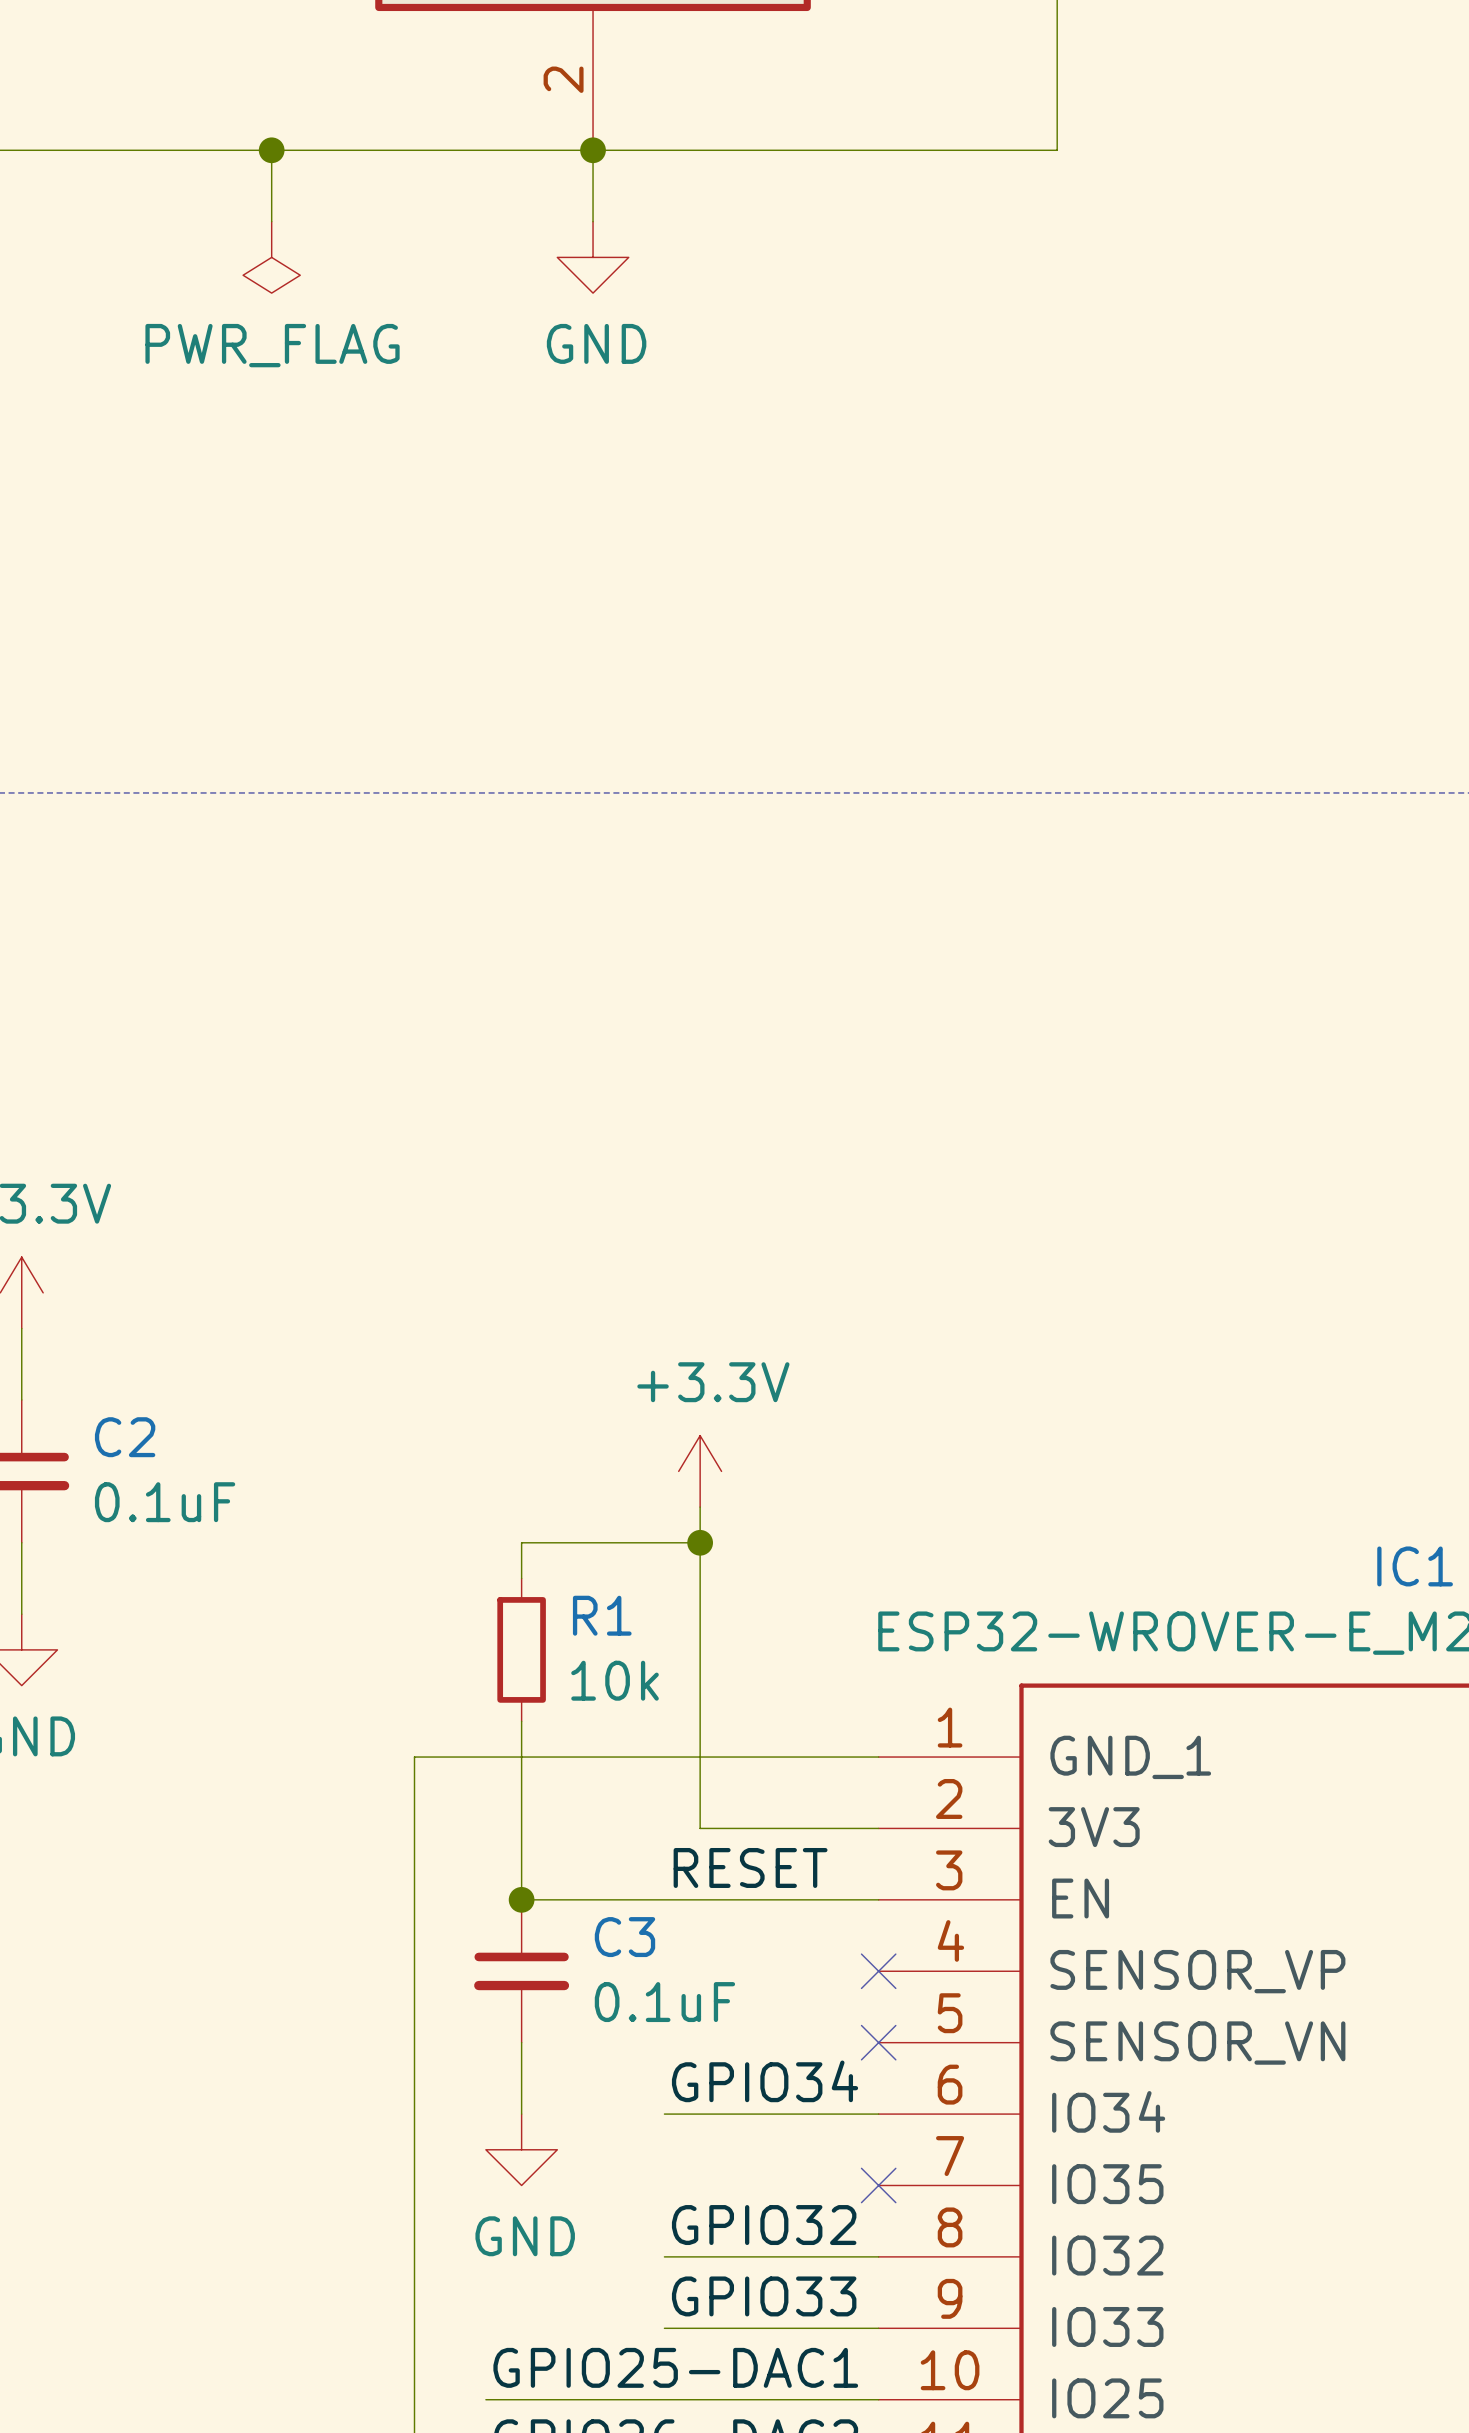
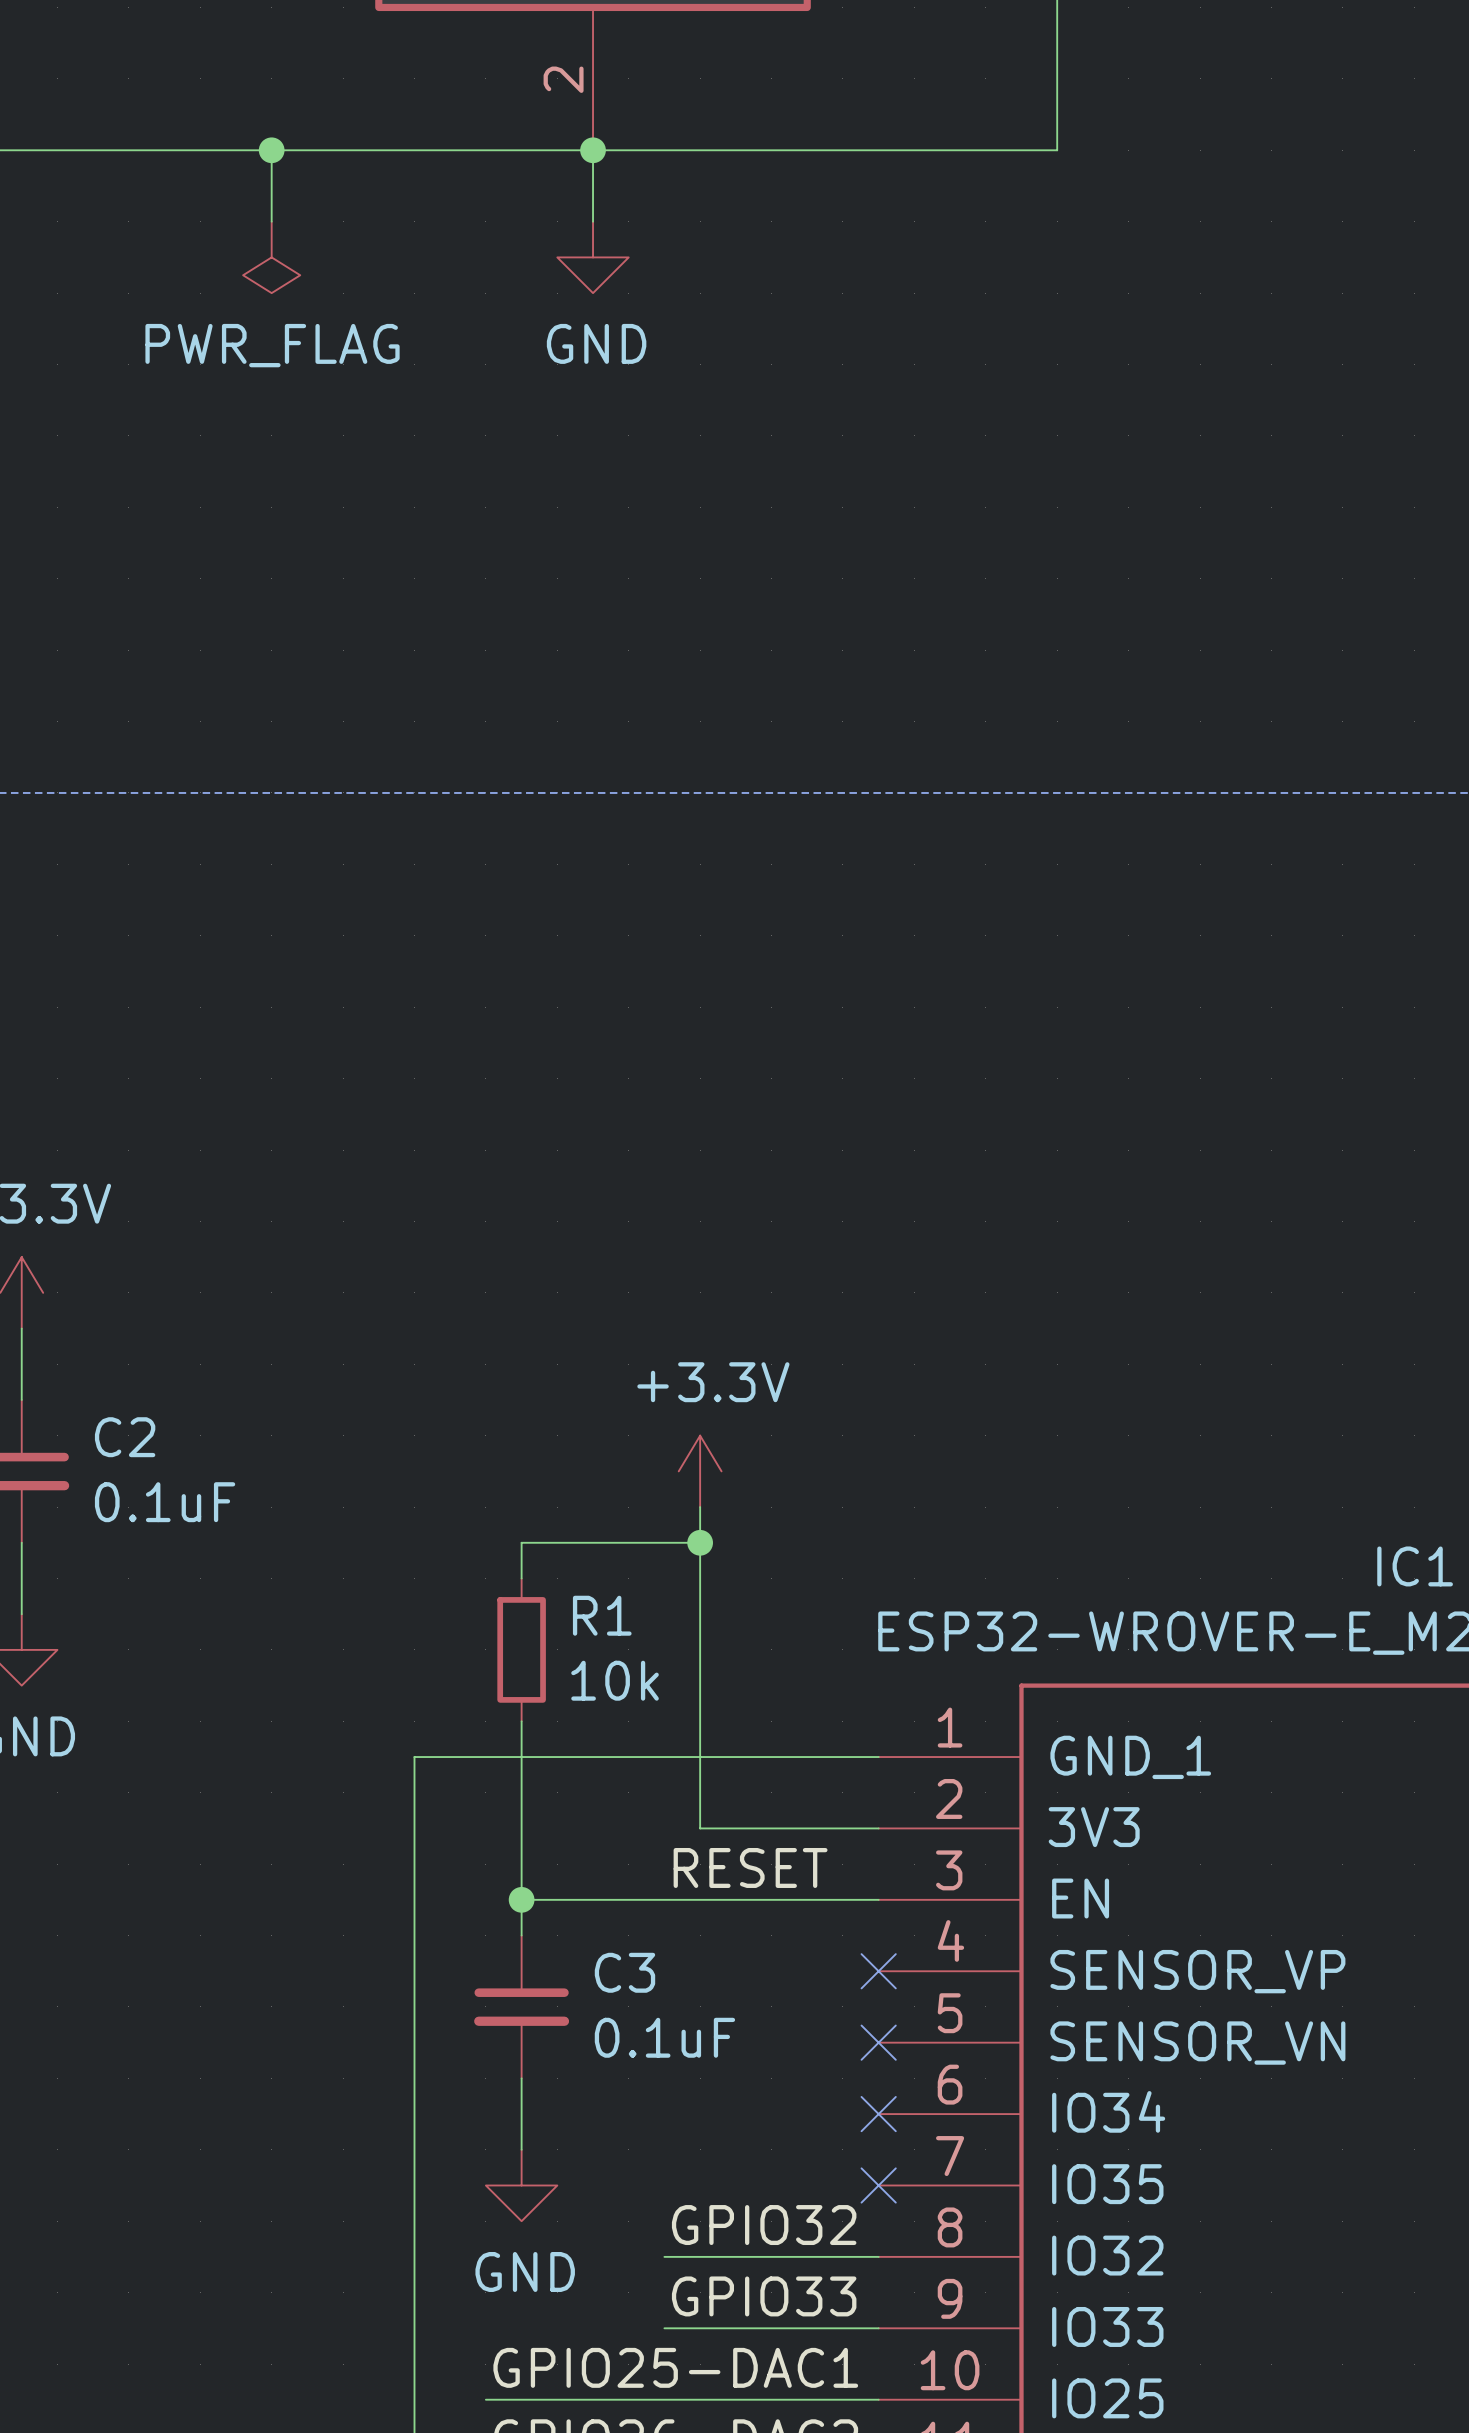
C3 position: (521, 1971) -> (521, 2006)
label: GPIO34 (765, 2081) -> none
wire: (664, 2114) (878, 2114) -> none
no-connect mark: none -> (878, 2114)
power symbol position: GND (521, 2149) -> GND (521, 2185)

